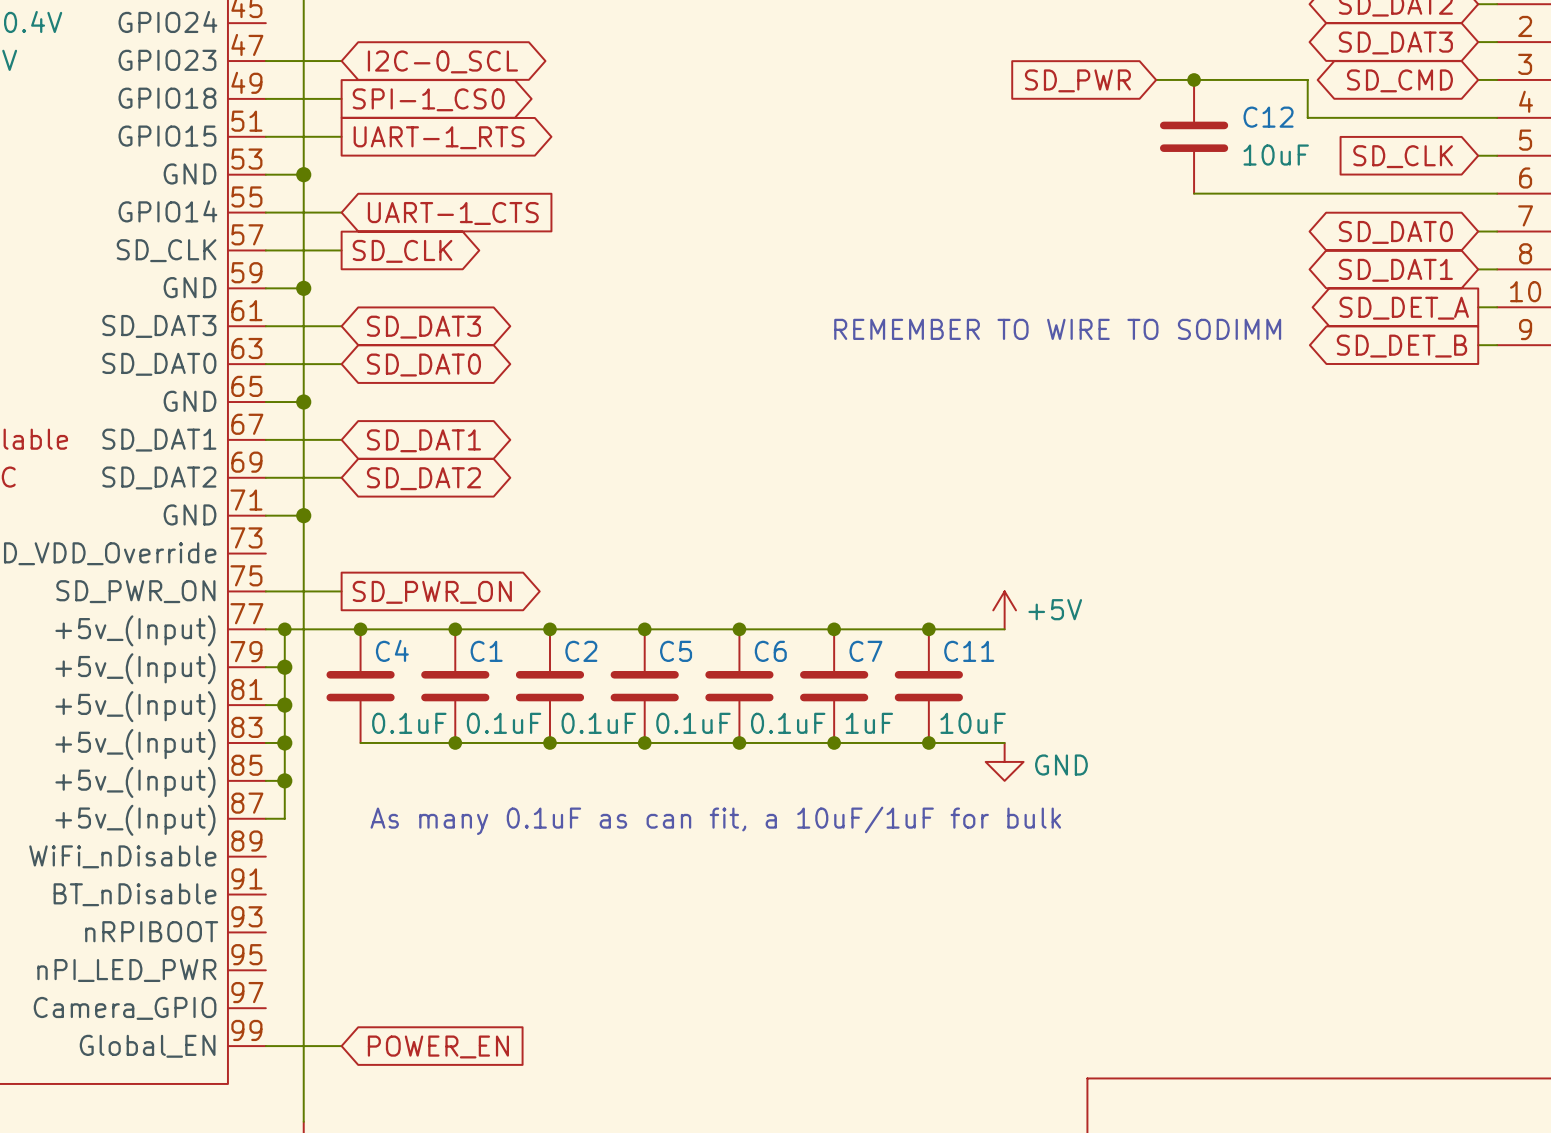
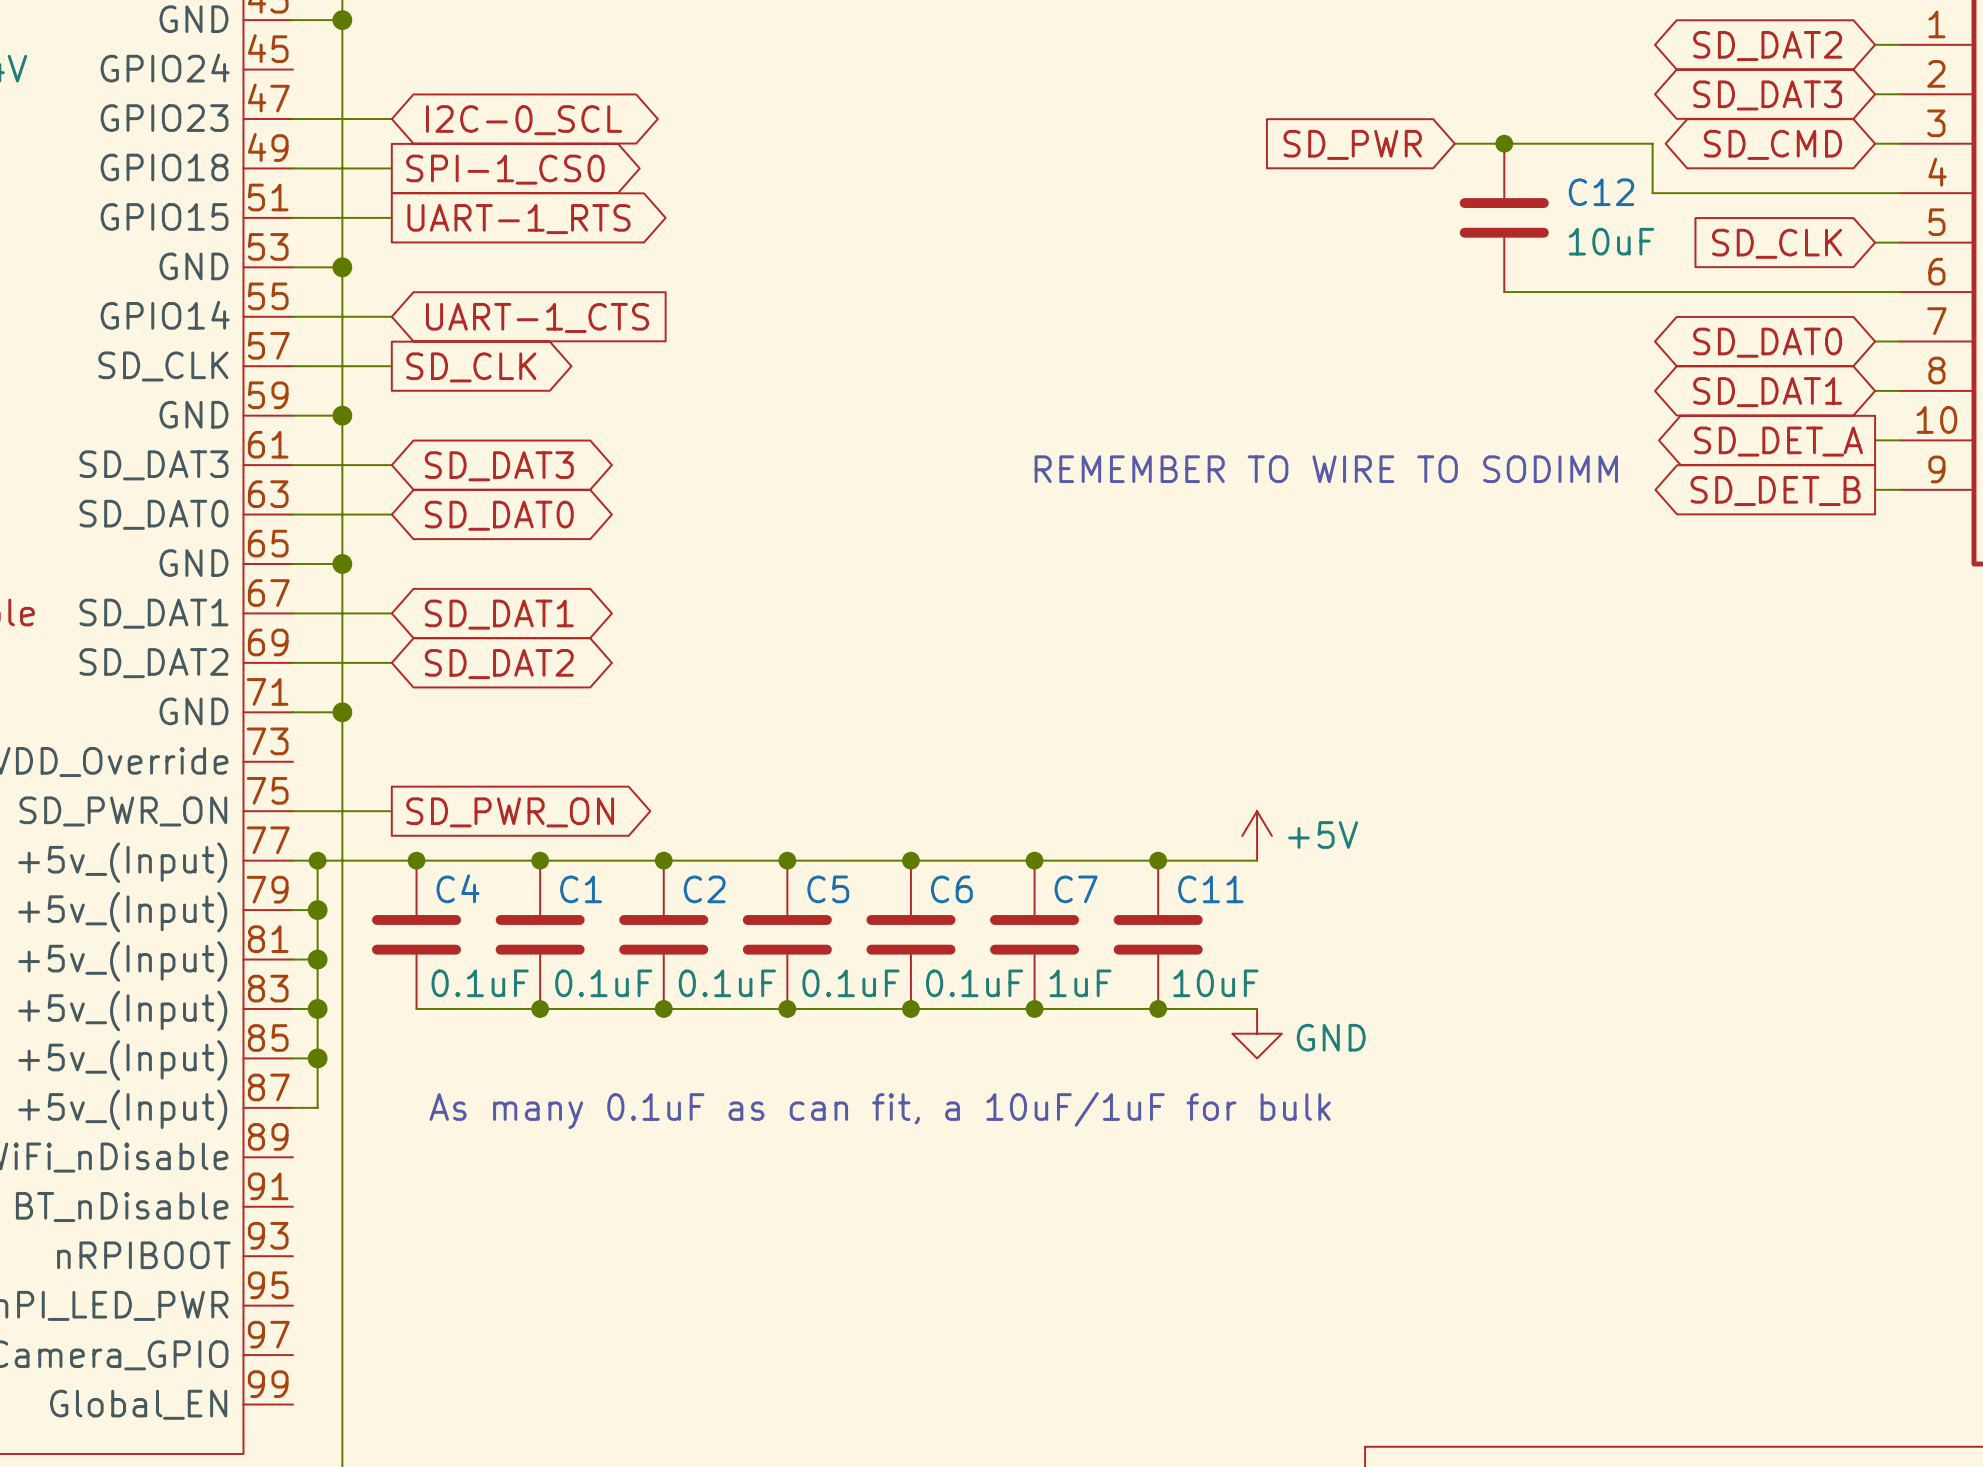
wire: (265, 1046) (341, 1046) -> none
global label: POWER_EN (438, 1046) -> none

